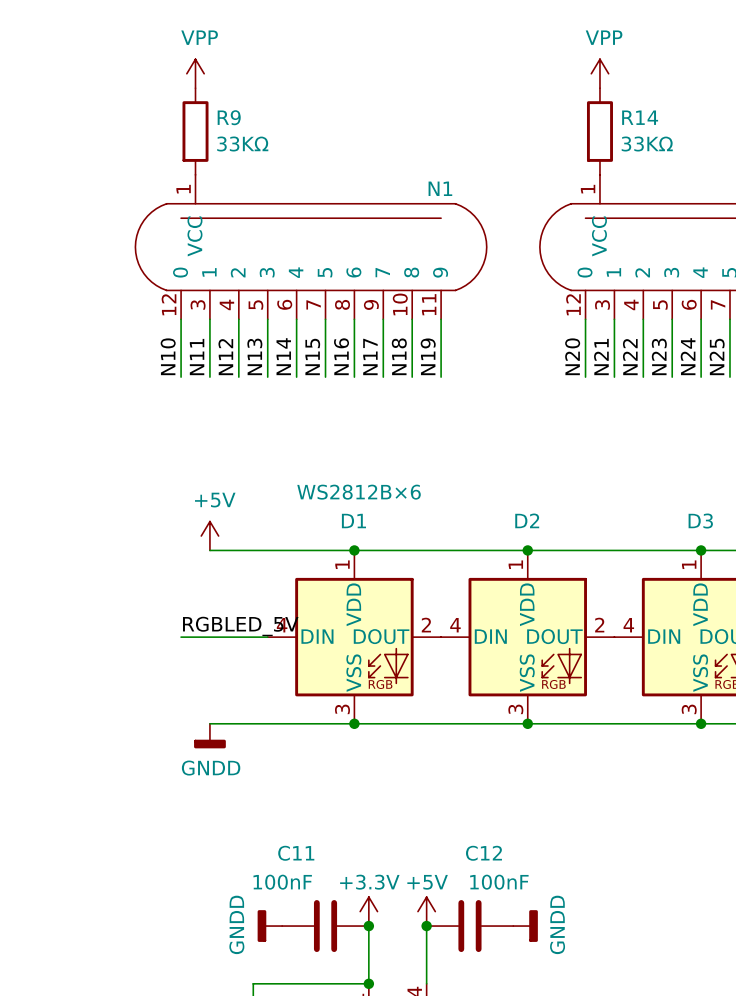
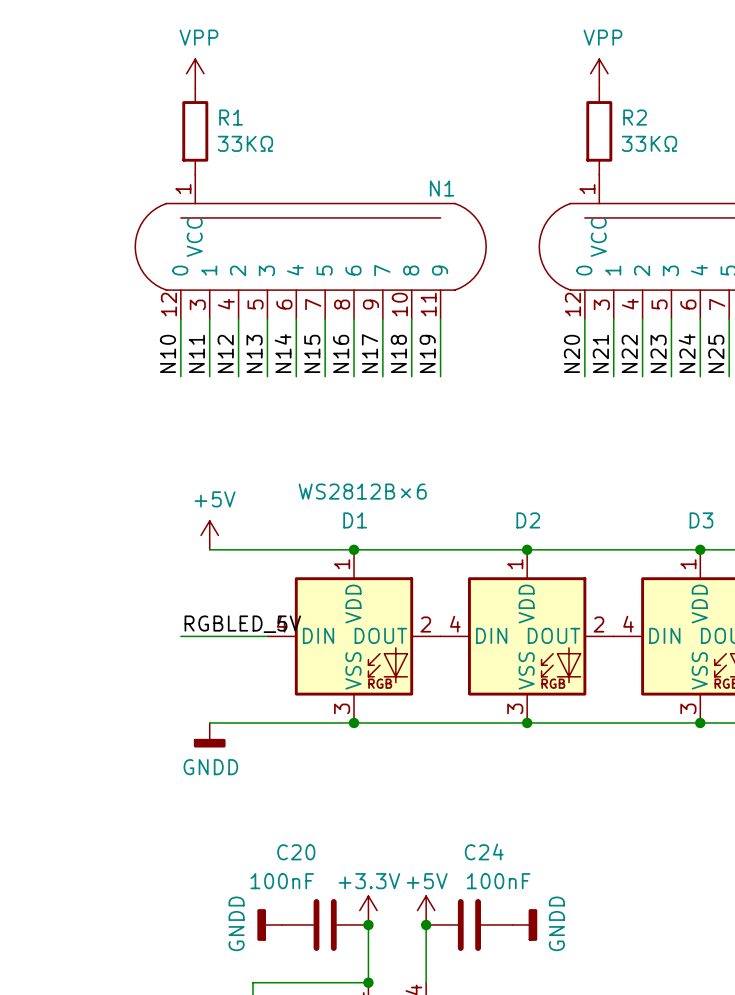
R9 name: R9 (229, 117) -> R1 (231, 117)
R14 name: R14 (640, 117) -> R2 (635, 117)
C11 name: C11 (296, 853) -> C20 (296, 852)
C12 name: C12 (483, 853) -> C24 (484, 851)

